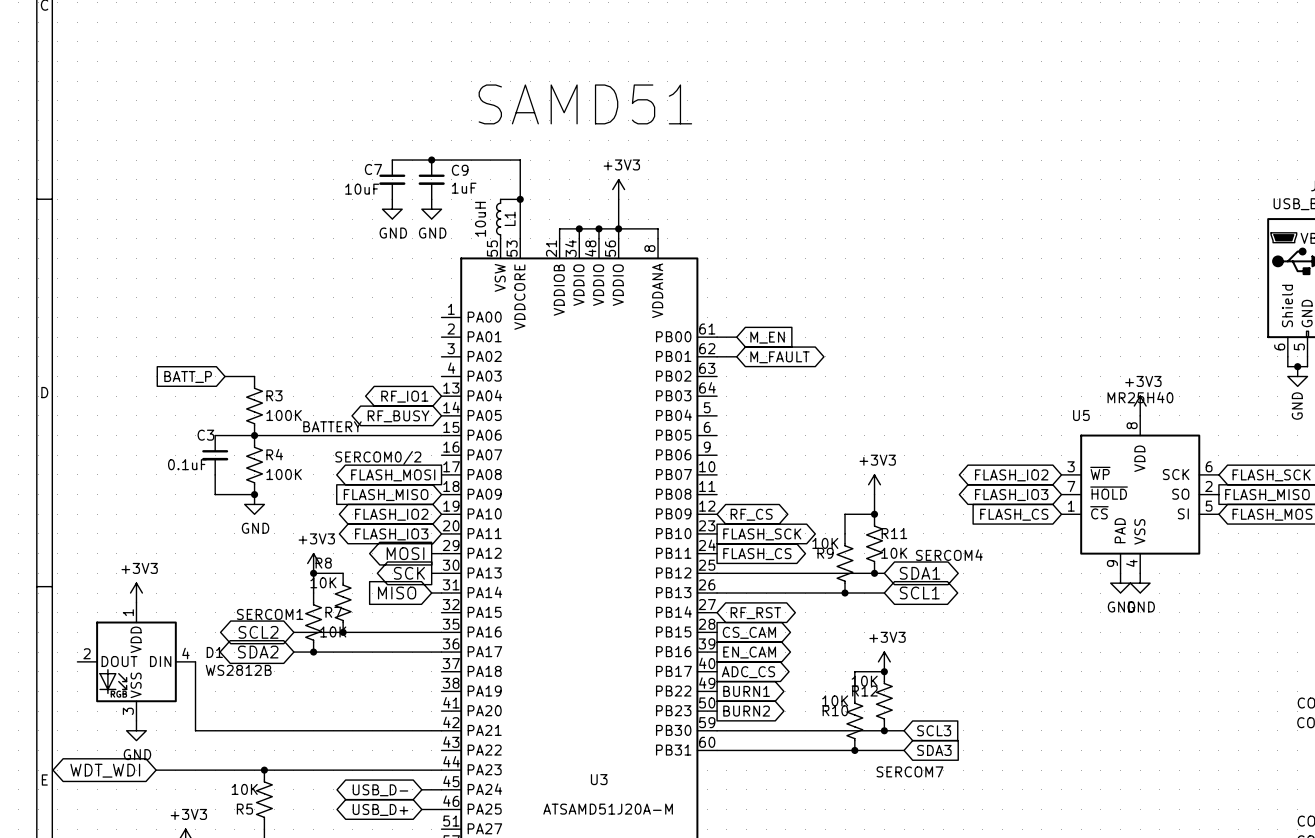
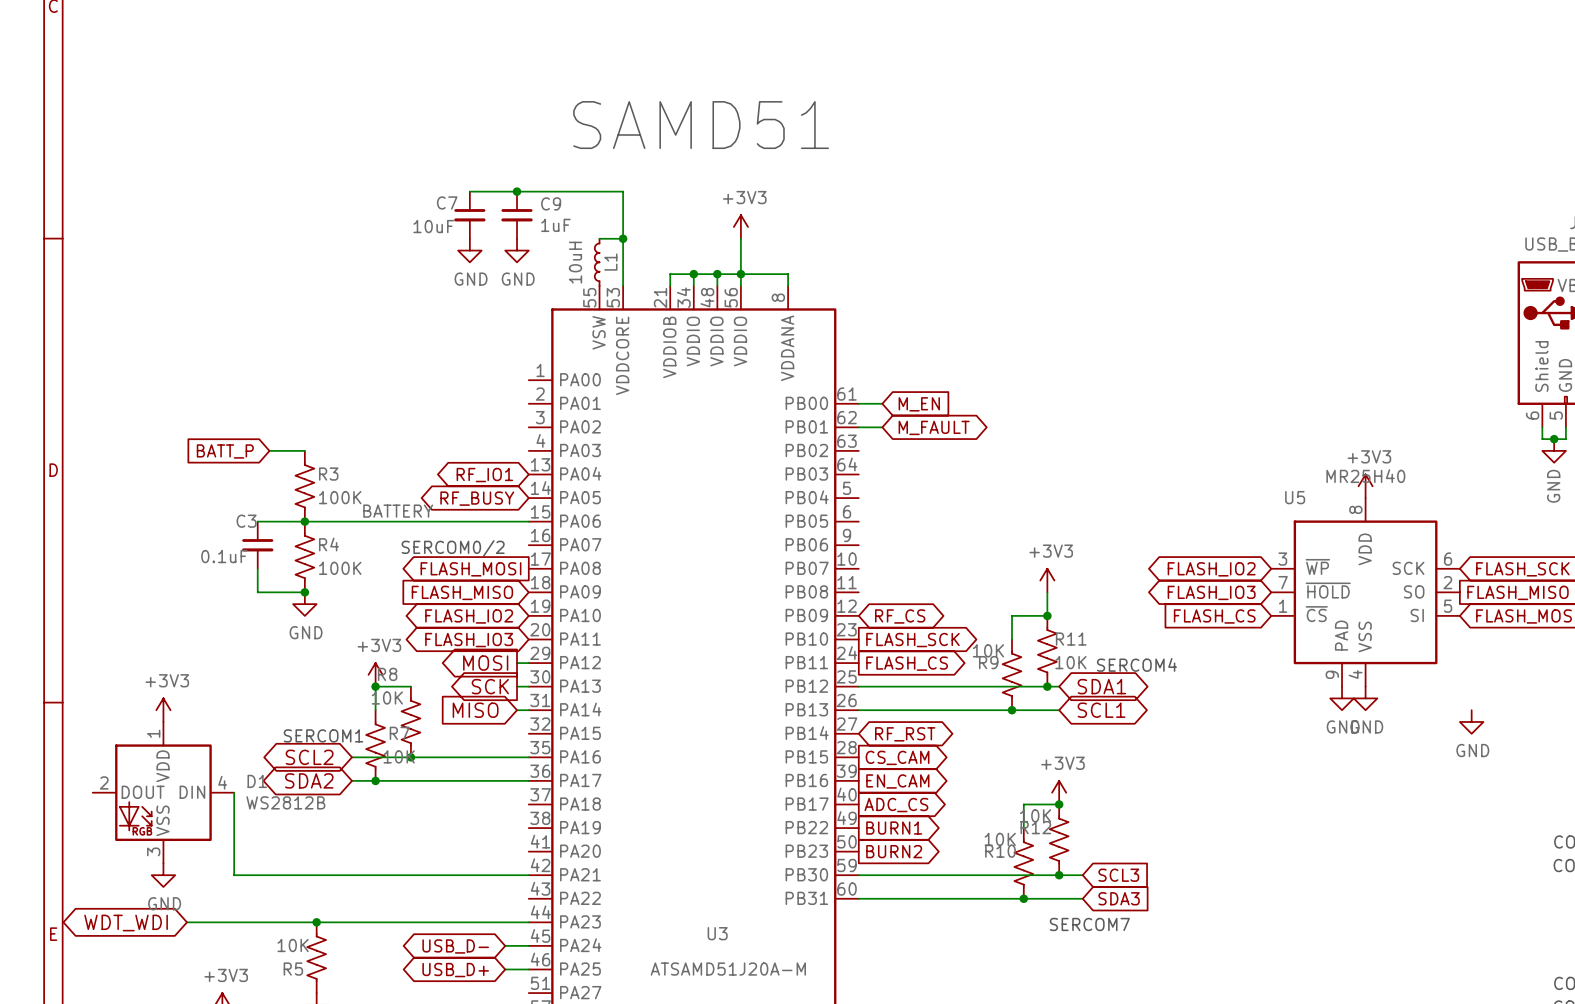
power symbol: none -> GND (1471, 721)

